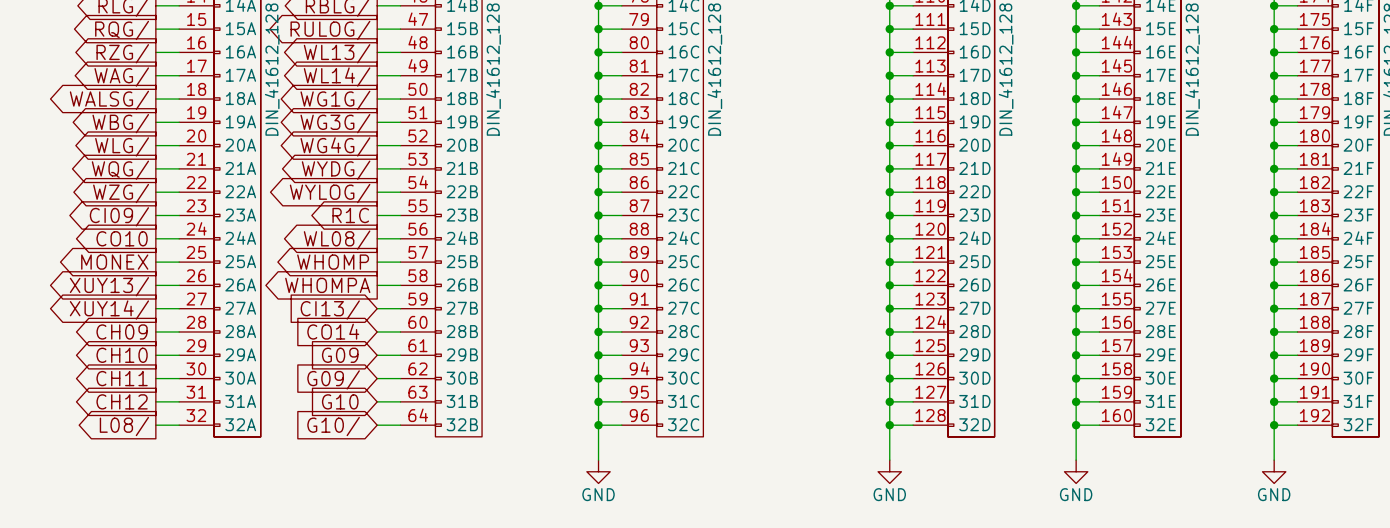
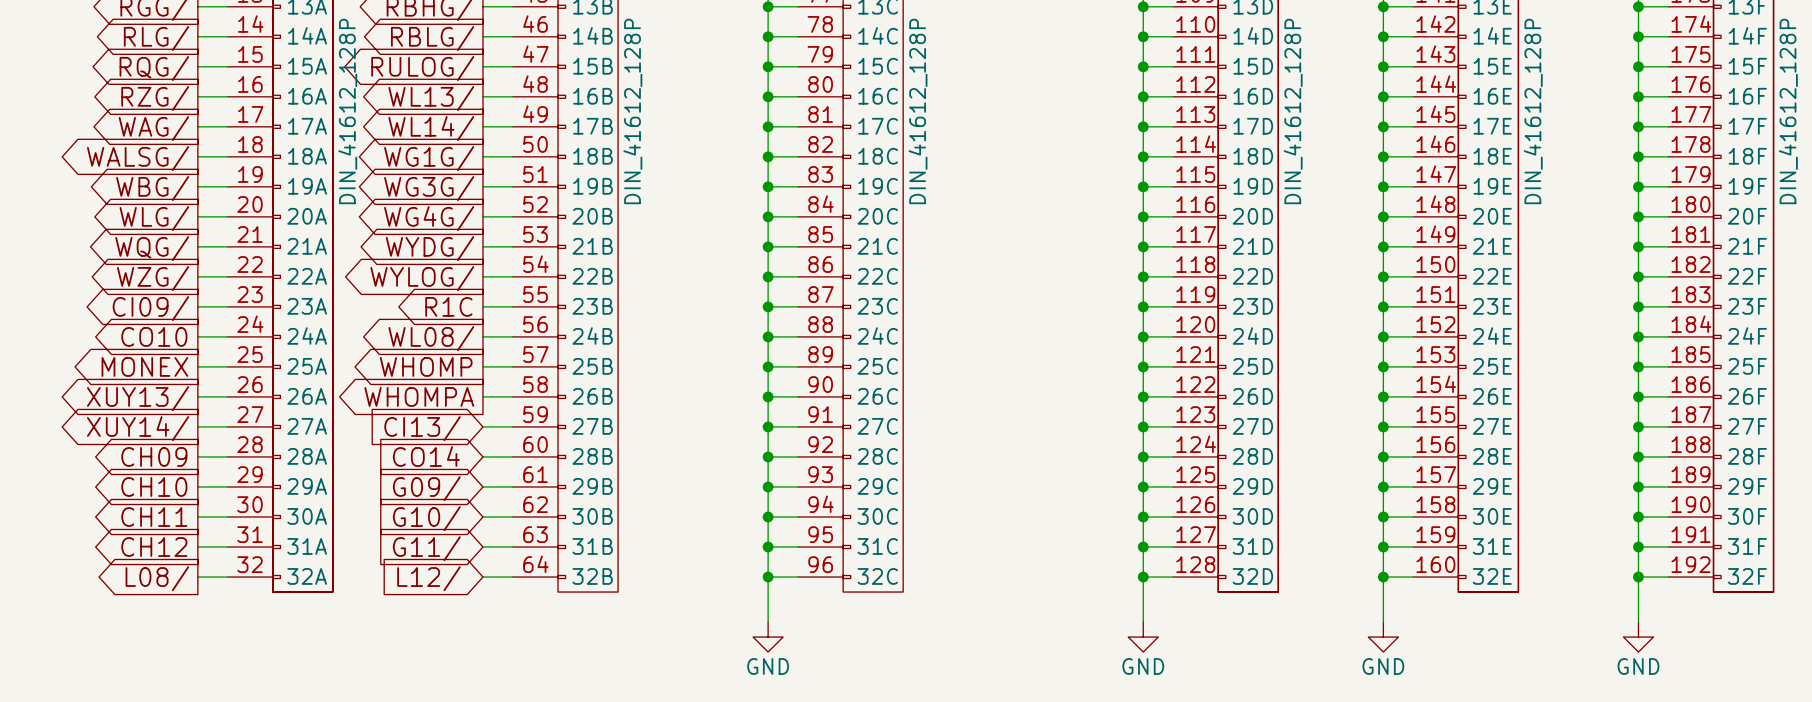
global label: G09 (340, 355) -> G09/ (426, 488)
global label: G09/ (333, 379) -> G10/ (426, 518)
global label: G10 (340, 401) -> G11/ (426, 548)
global label: G10/ (333, 426) -> L12/ (428, 578)

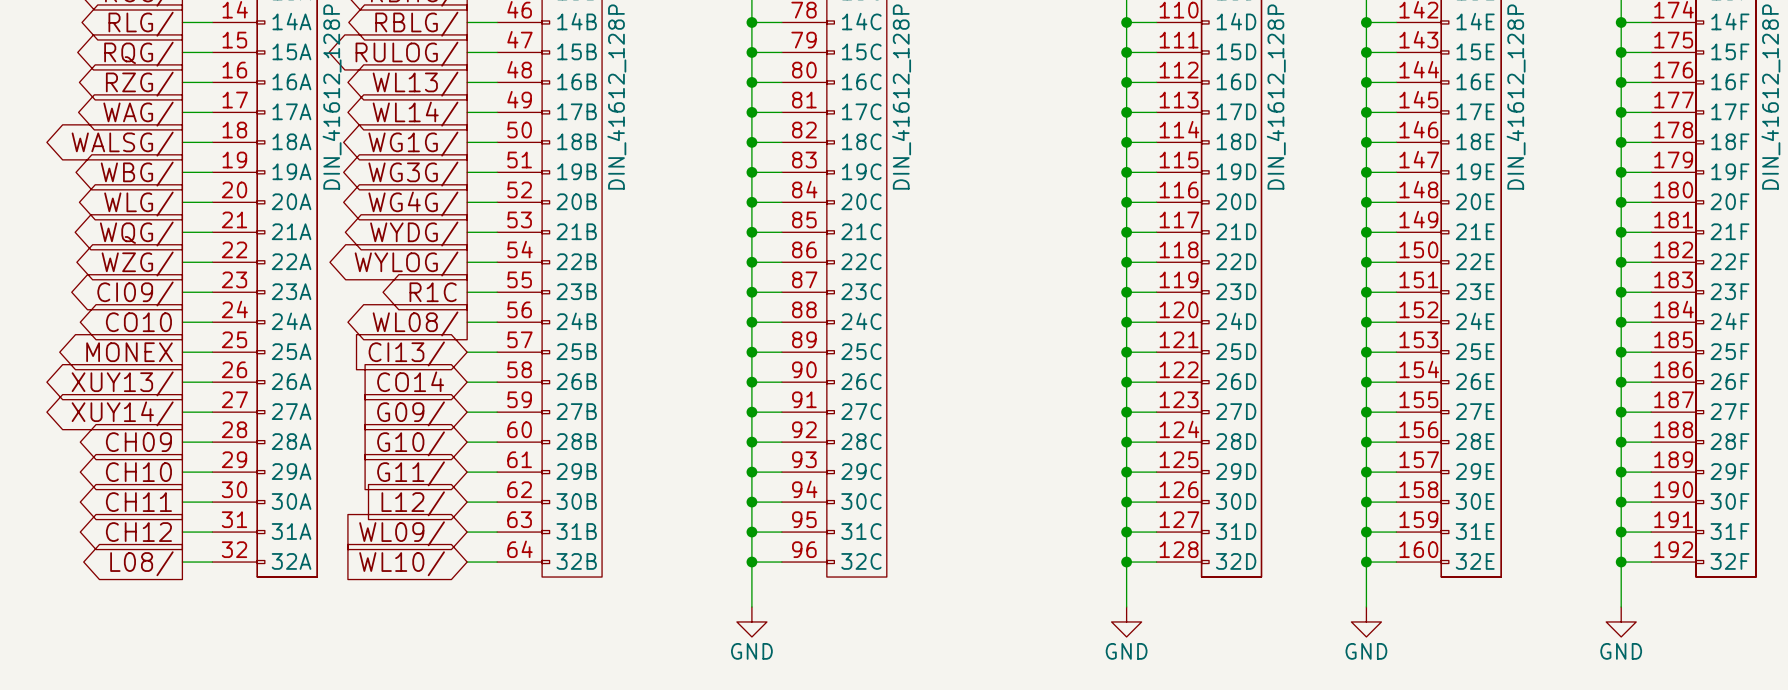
global label shape: output (426, 366) -> input (406, 353)
global label: WHOMP (426, 366) -> CI13/ (406, 353)
global label shape: output (419, 396) -> input (410, 381)
global label: WHOMPA (419, 396) -> CO14 (410, 381)
global label: CI13/ (422, 428) -> G09/ (411, 413)
global label: CO14 (426, 456) -> G10/ (411, 443)
global label: G09/ (426, 488) -> G11/ (411, 473)
global label: G10/ (426, 518) -> L12/ (413, 503)
global label: G11/ (426, 548) -> WL09/ (402, 533)
global label: L12/ (428, 578) -> WL10/ (402, 563)

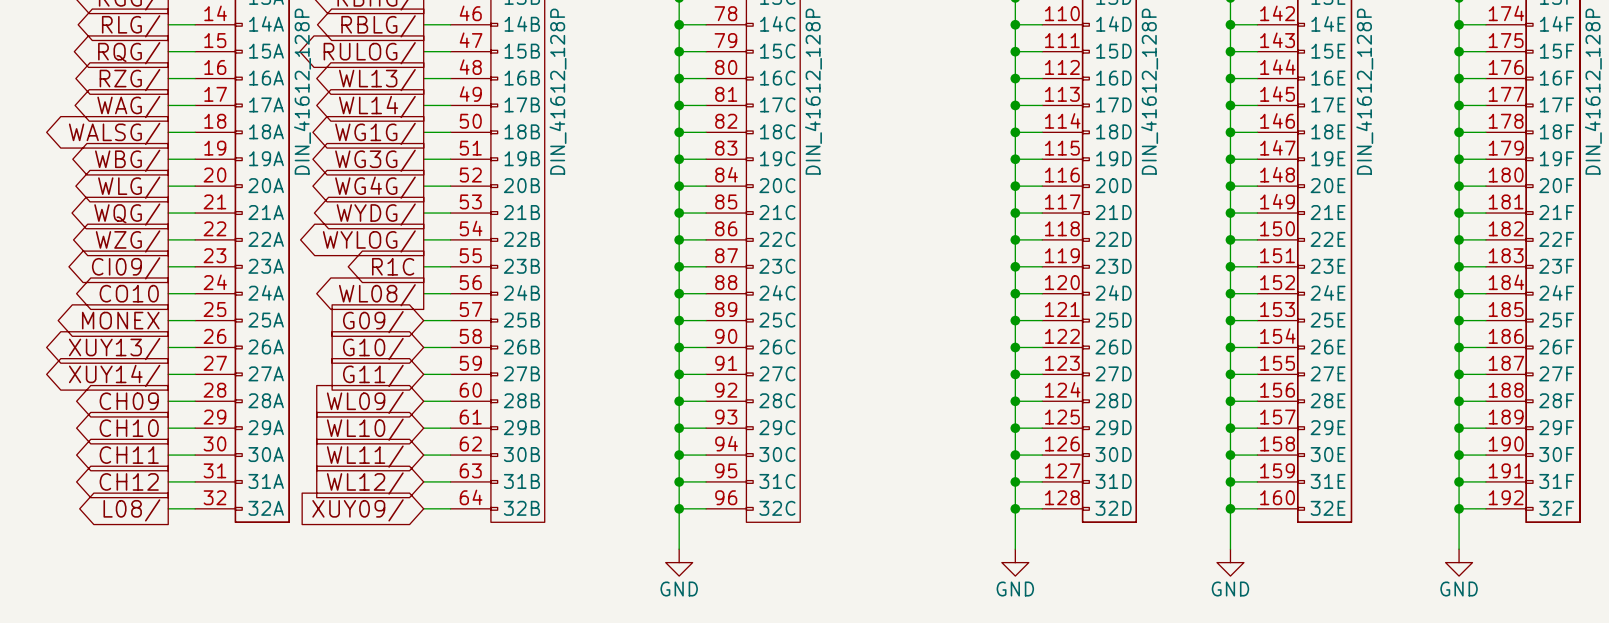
global label: CI13/ (406, 353) -> G09/ (373, 322)
global label: CO14 (410, 381) -> G10/ (373, 349)
global label: G09/ (411, 413) -> G11/ (373, 375)
global label: G10/ (411, 443) -> WL09/ (365, 402)
global label: G11/ (411, 473) -> WL10/ (365, 429)
global label: L12/ (413, 503) -> WL11/ (365, 456)
global label: WL09/ (402, 533) -> WL12/ (365, 483)
global label: WL10/ (402, 563) -> XUY09/ (358, 510)

